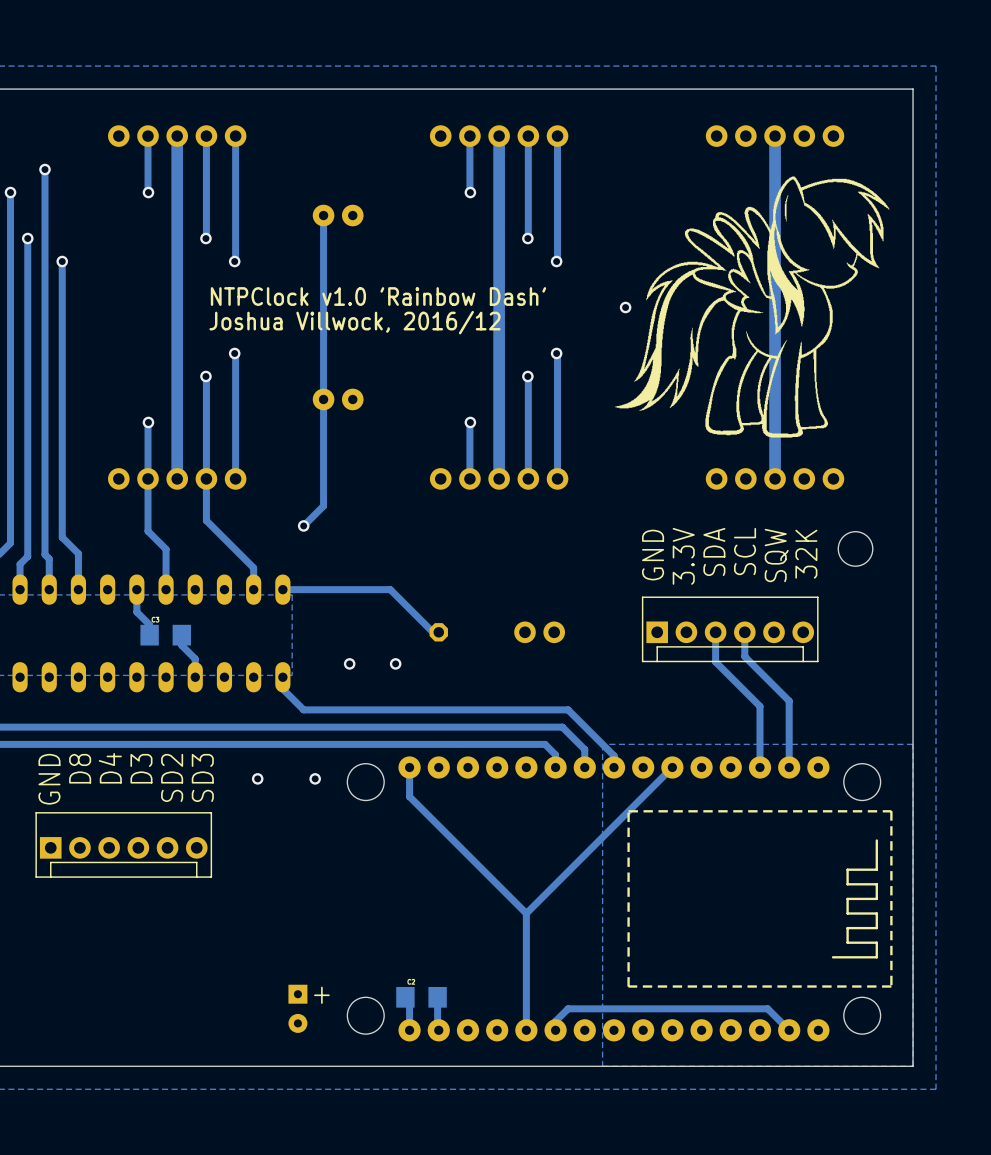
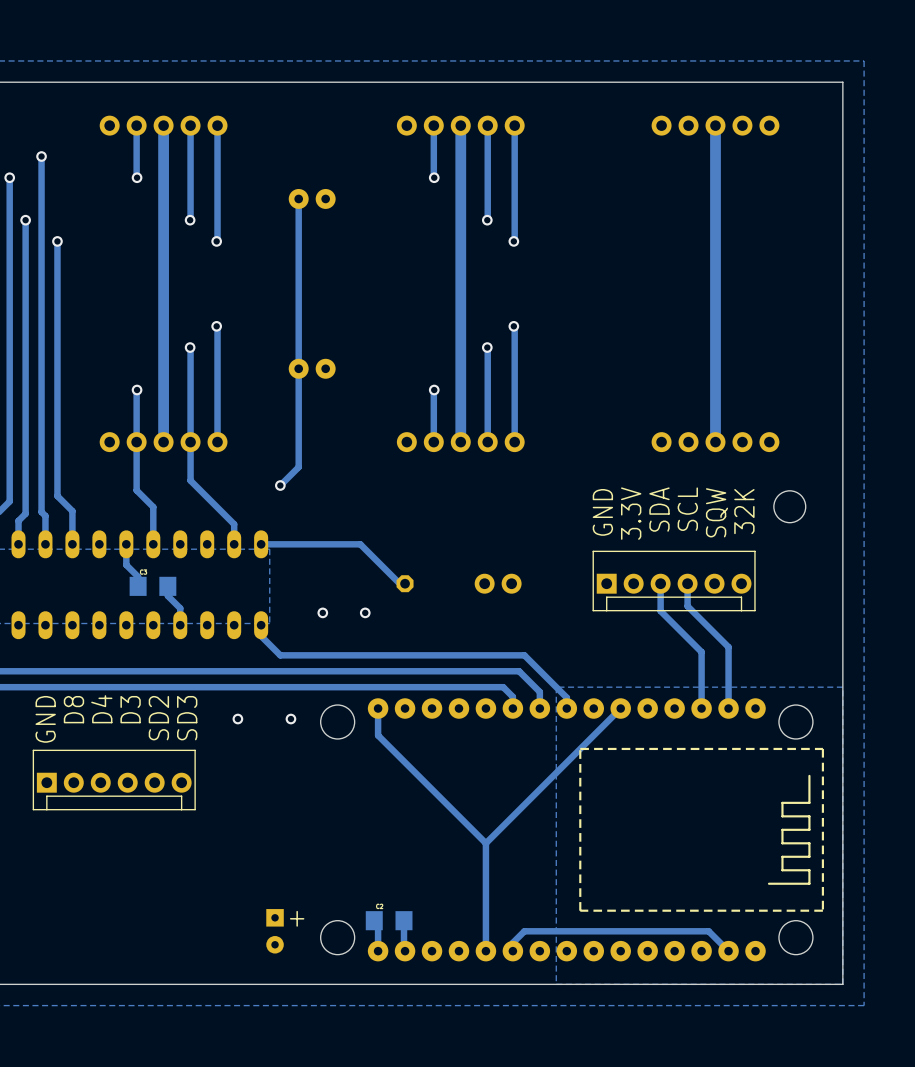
drawing: [614, 176, 890, 438] -> none
text: NTPClock v1.0 'Rainbow Dash' (378, 296) -> none
via: (625, 307) -> none
text: Joshua Villwock, 2016/12 (355, 322) -> none

